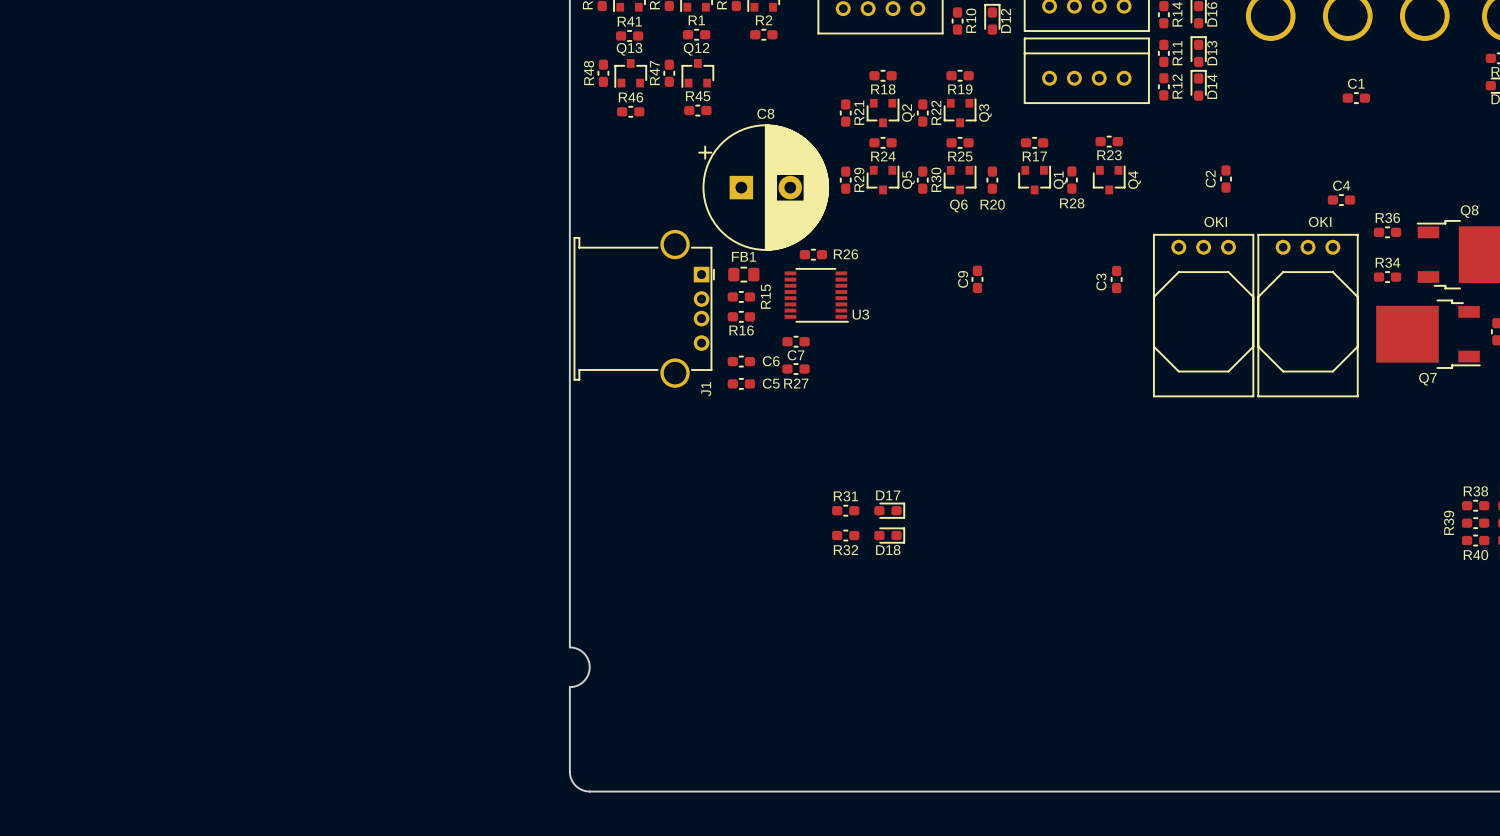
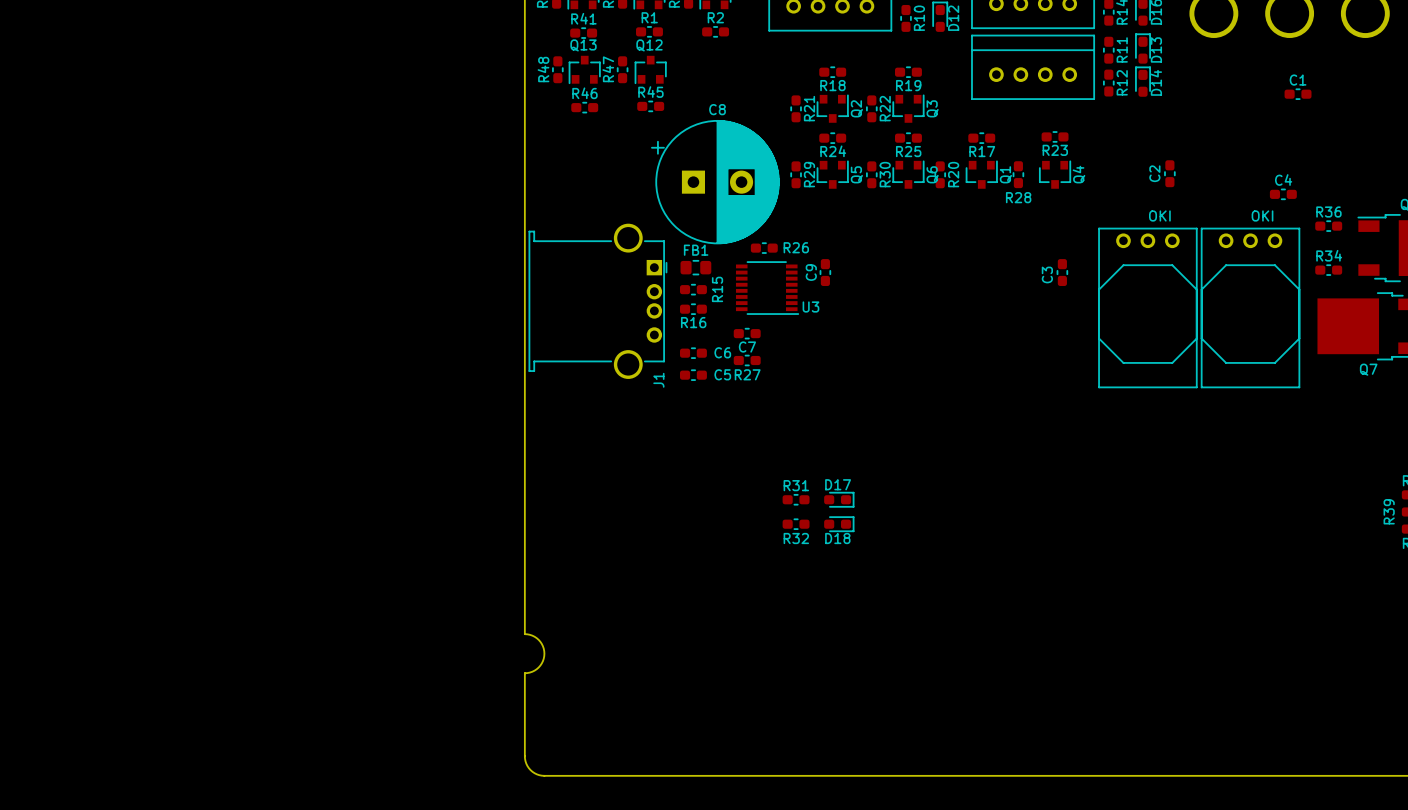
R20 name rotation: 0° (992, 204) -> 90° counterclockwise (953, 174)
Q6 name rotation: 0° (958, 205) -> 90° counterclockwise (932, 174)
Q6 name position: Q6 (958, 205) -> Q6 (932, 174)
C9 position: (977, 279) -> (825, 272)

